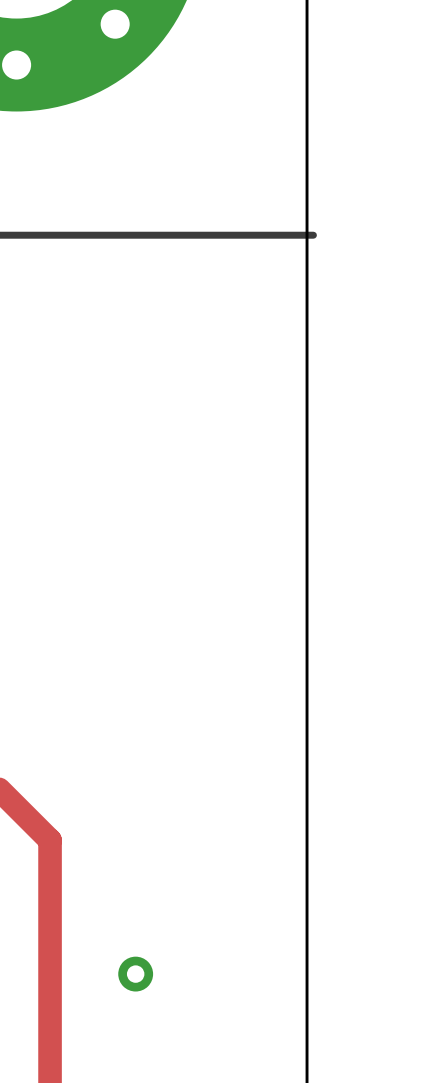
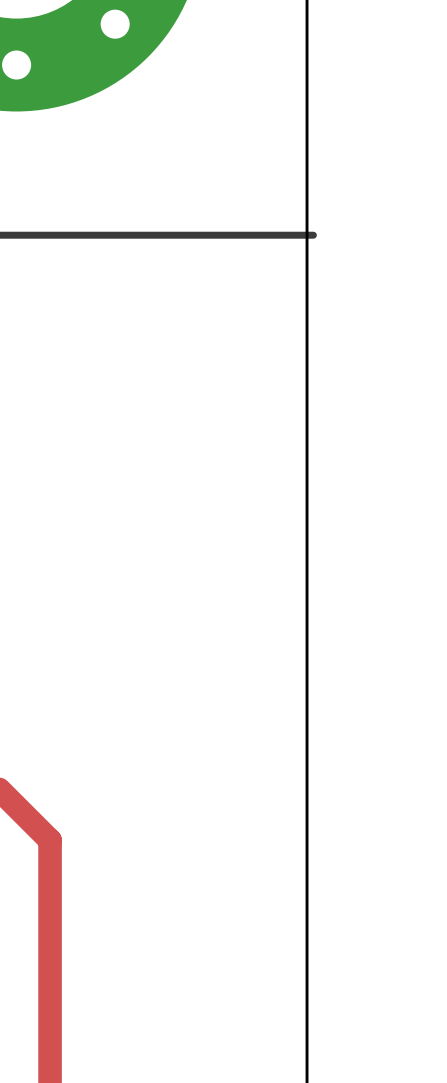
via: (135, 974) -> none

